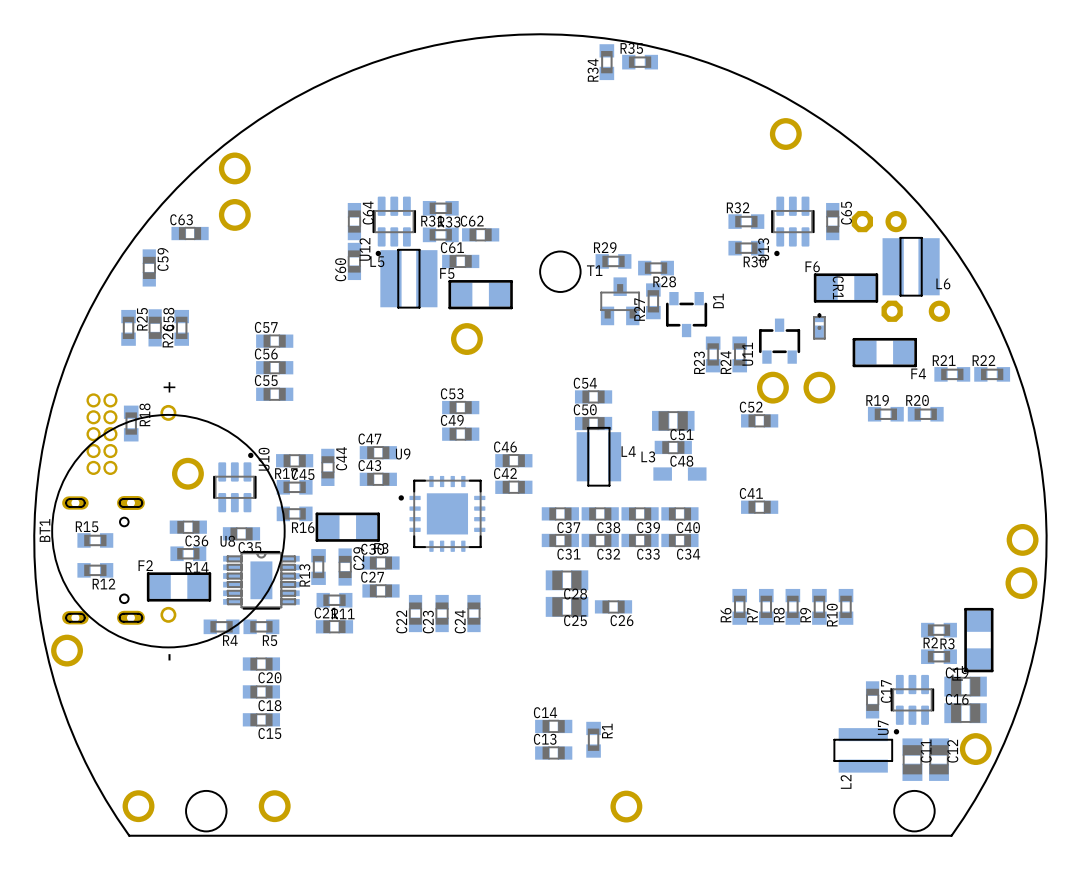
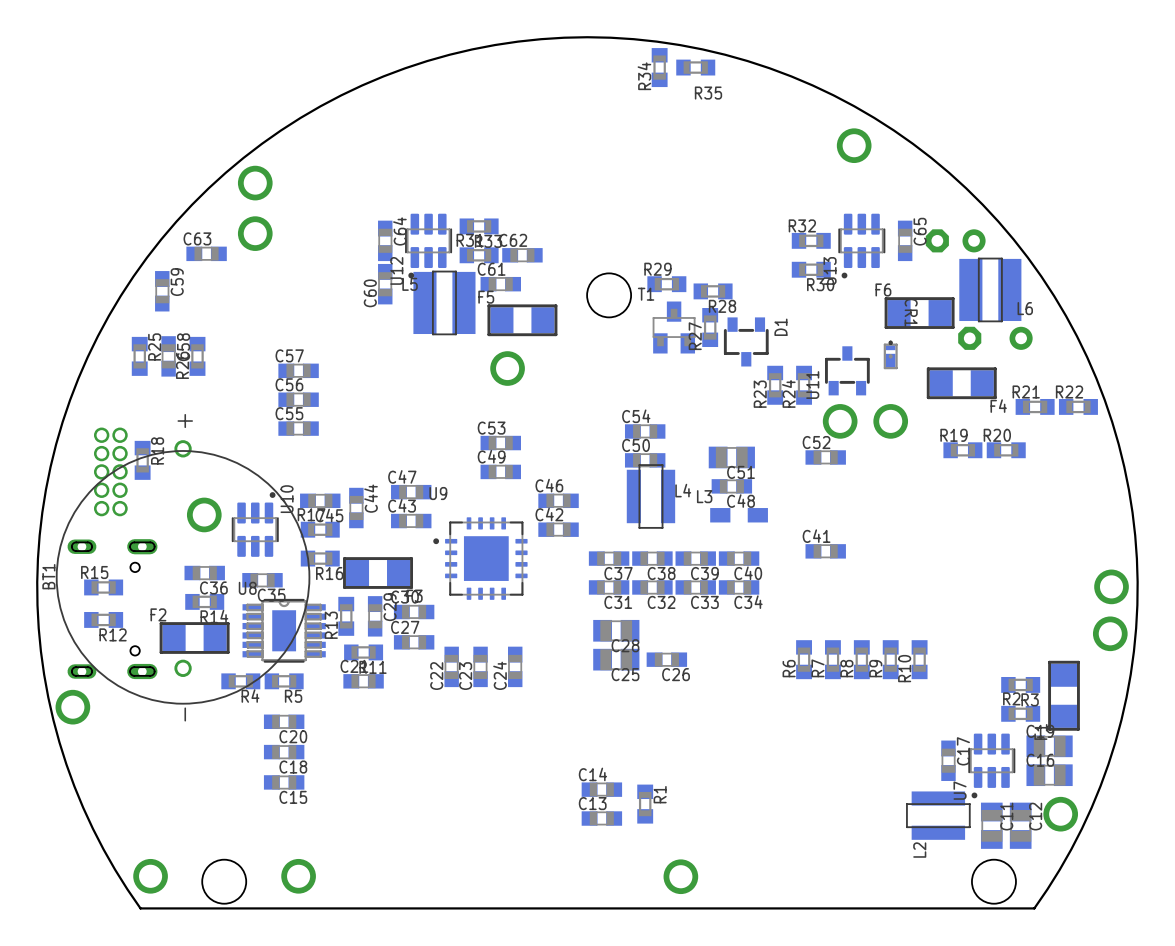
R35 name position: R35 (631, 48) -> R35 (708, 93)

